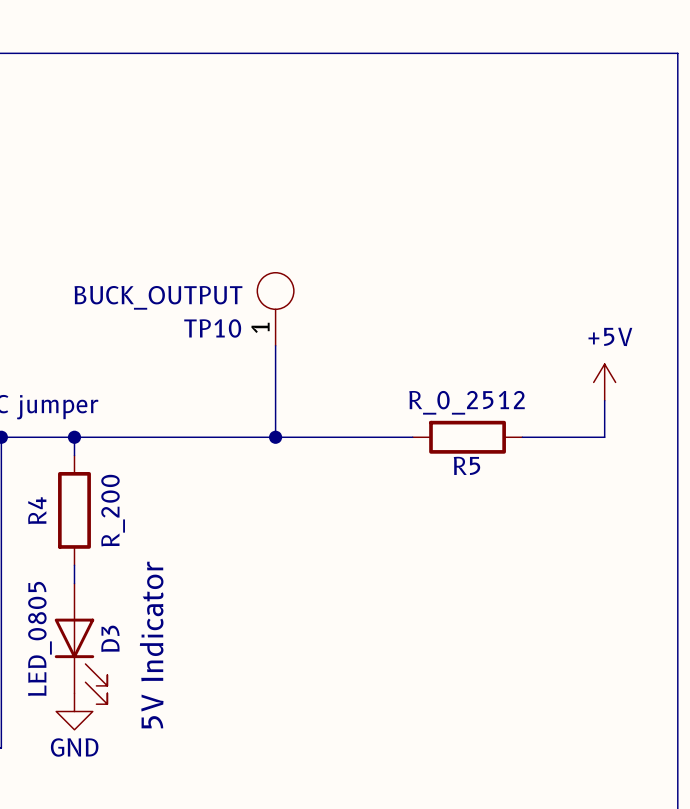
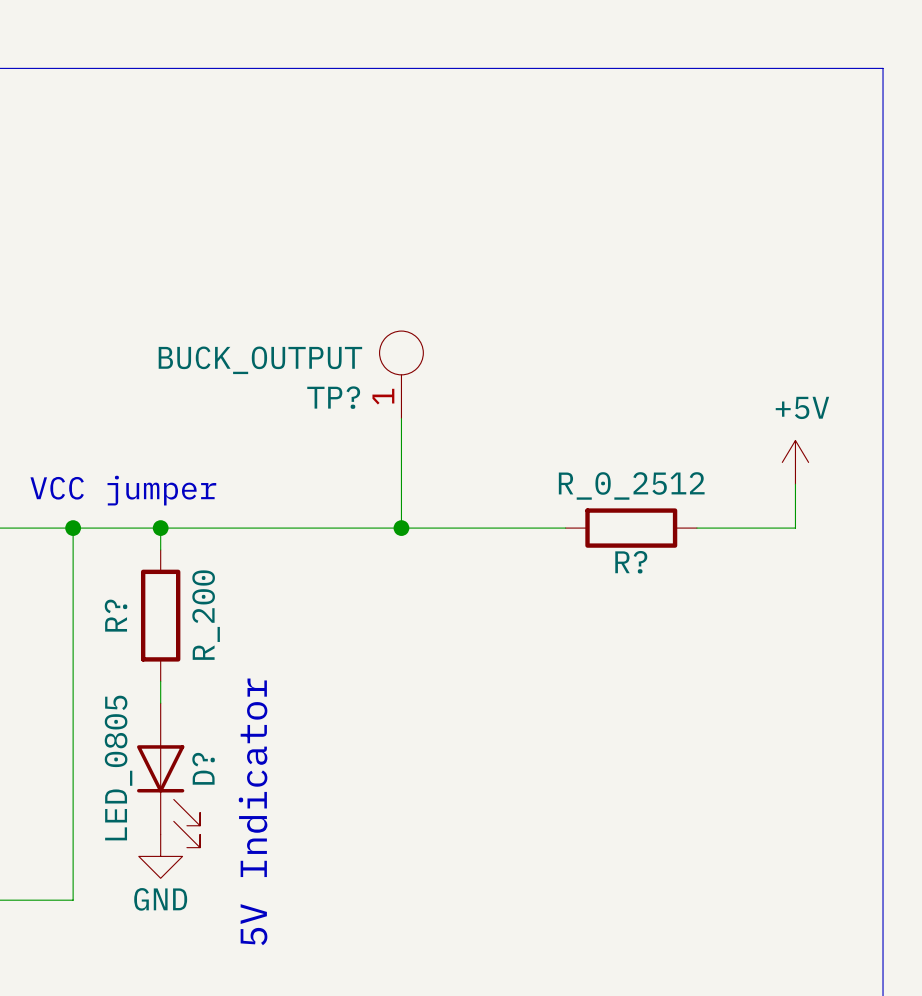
TP10 name: TP10 (212, 328) -> TP? (333, 397)
R5 name: R5 (466, 465) -> R? (631, 562)
R4 name: R4 (37, 510) -> R? (116, 615)
D3 name: D3 (110, 638) -> D? (203, 768)

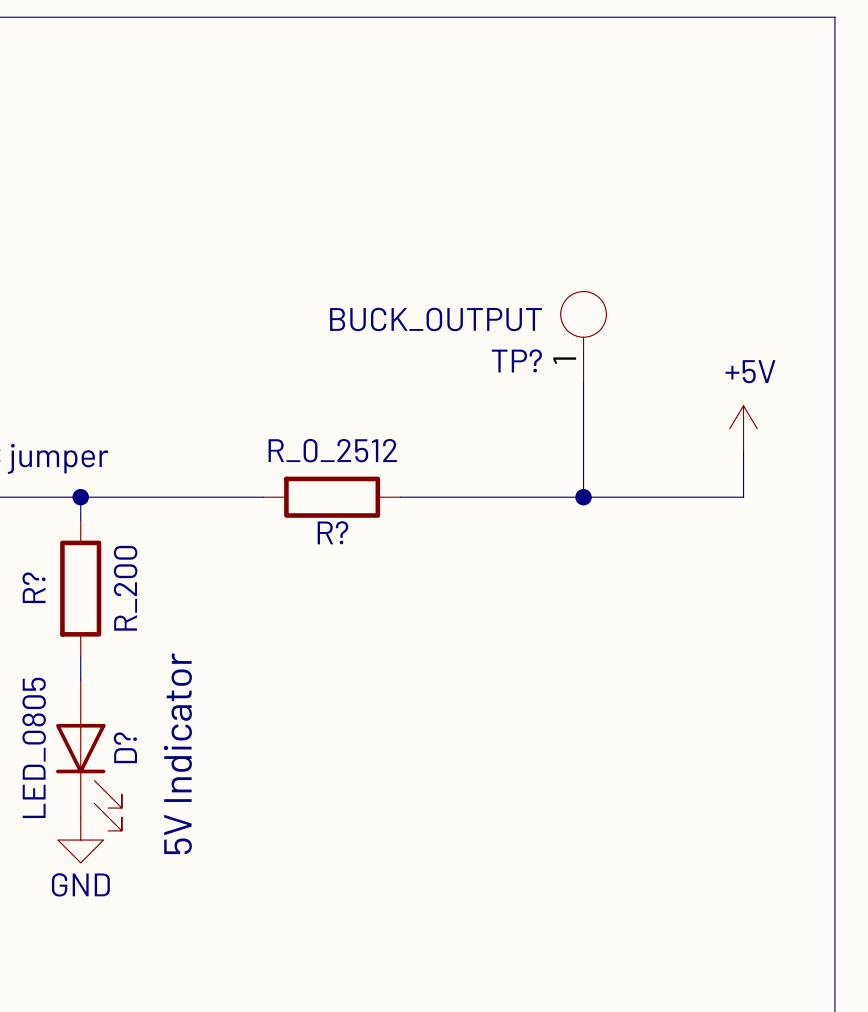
TP? position: (401, 374) -> (583, 337)
wire: (401, 418) (401, 528) -> (583, 382) (583, 497)
wire: (335, 528) (467, 528) -> (503, 497) (640, 497)
junction: (401, 528) -> none
R? position: (631, 528) -> (332, 497)
junction: none -> (583, 497)

